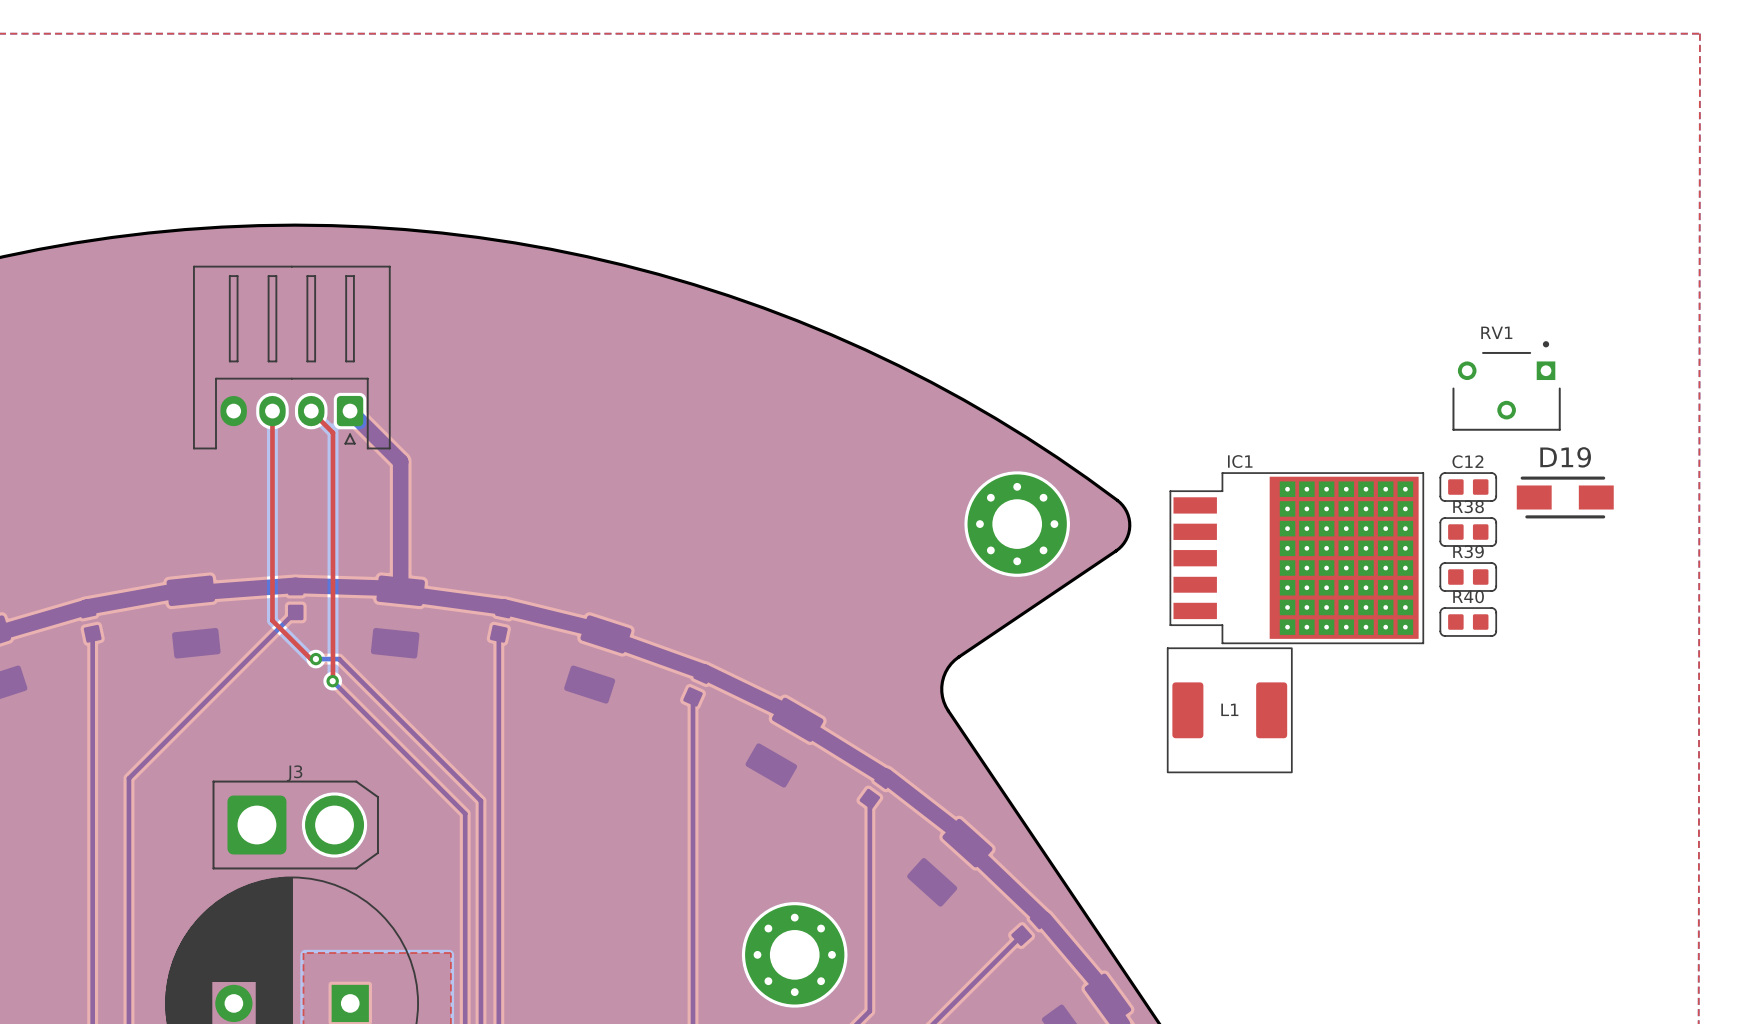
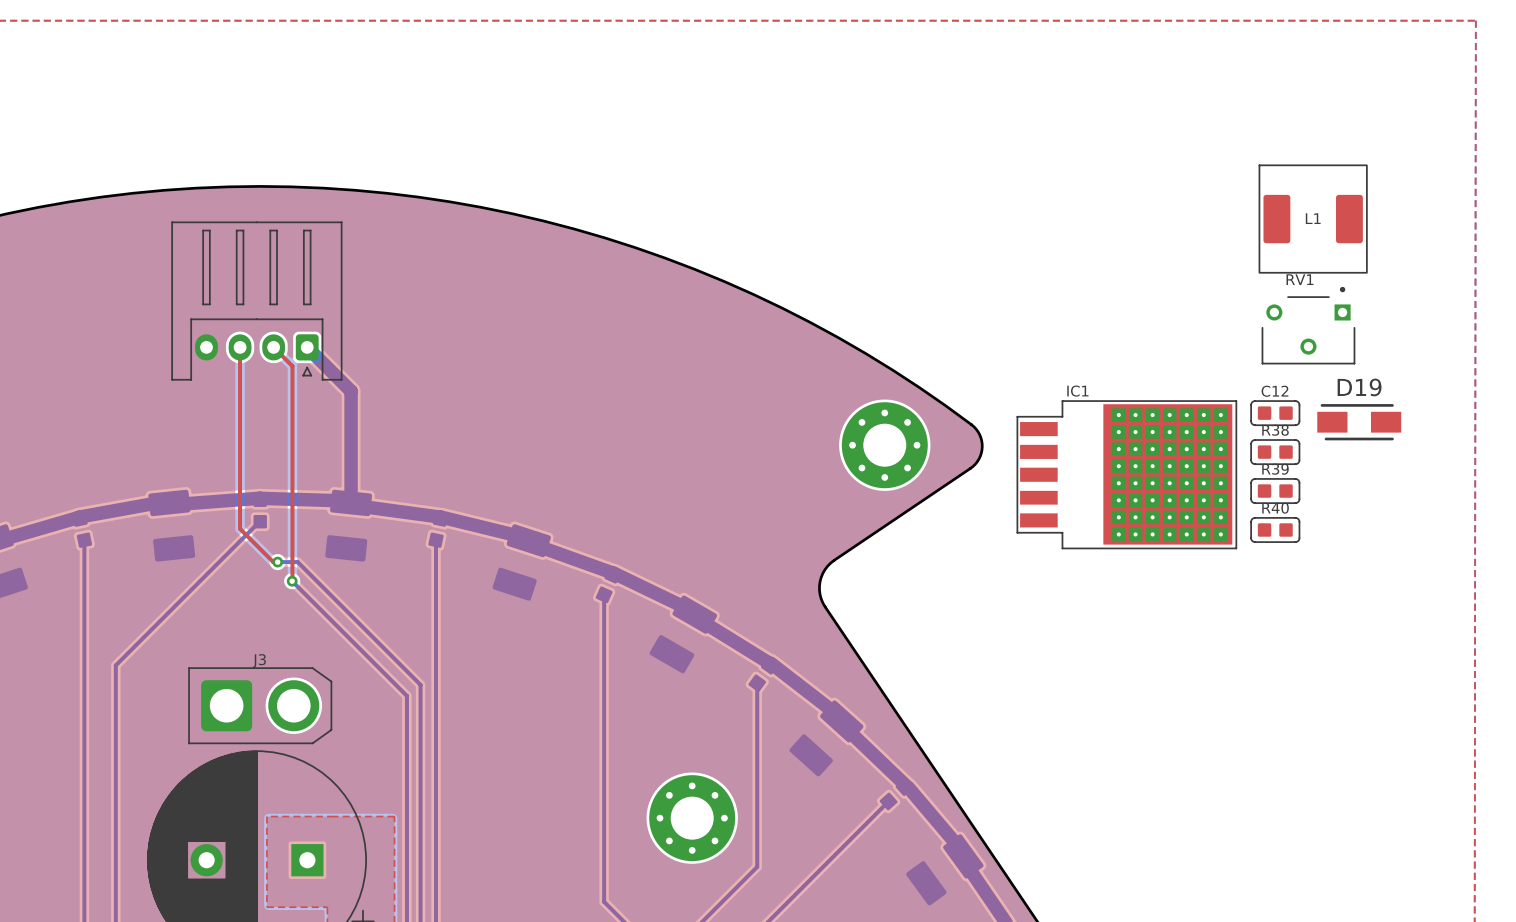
L1 position: (1229, 710) -> (1313, 219)

